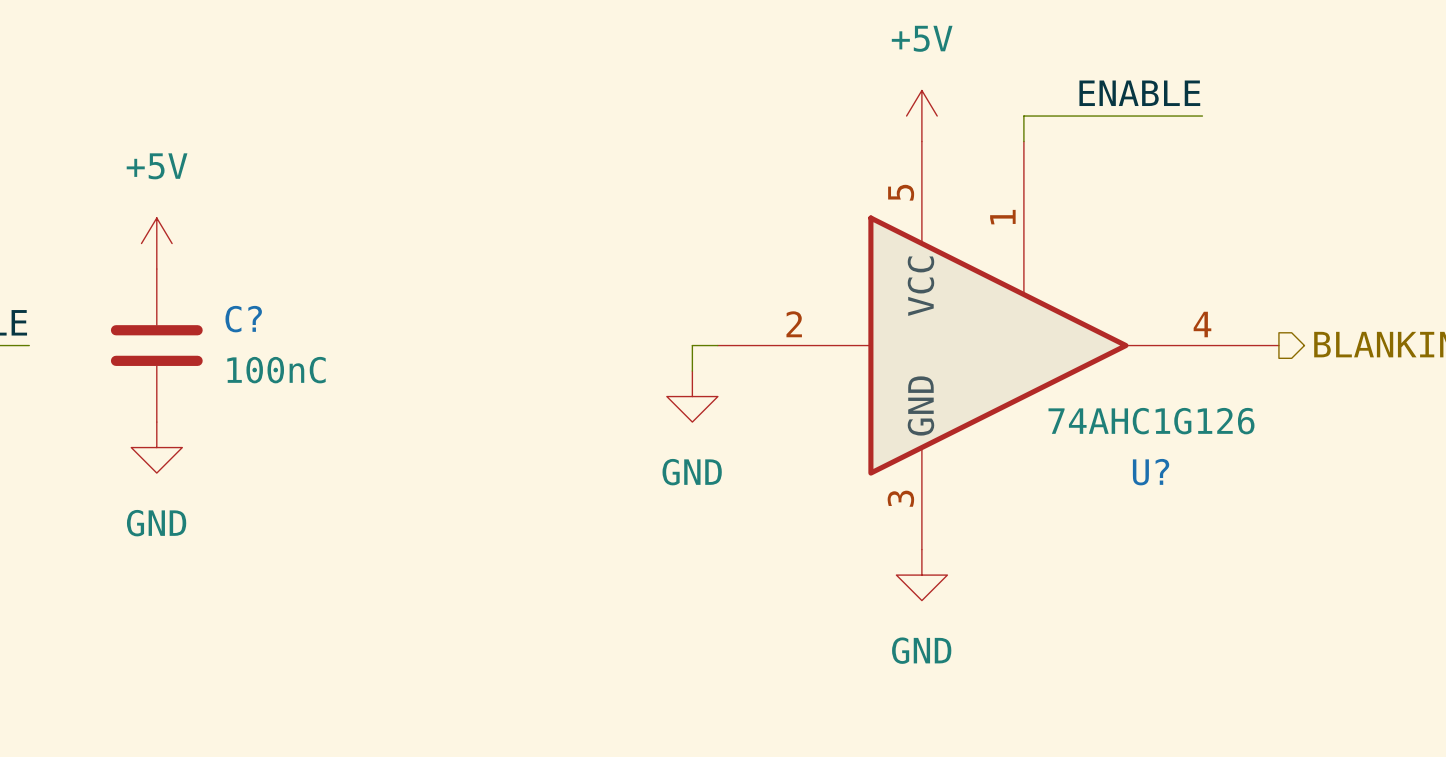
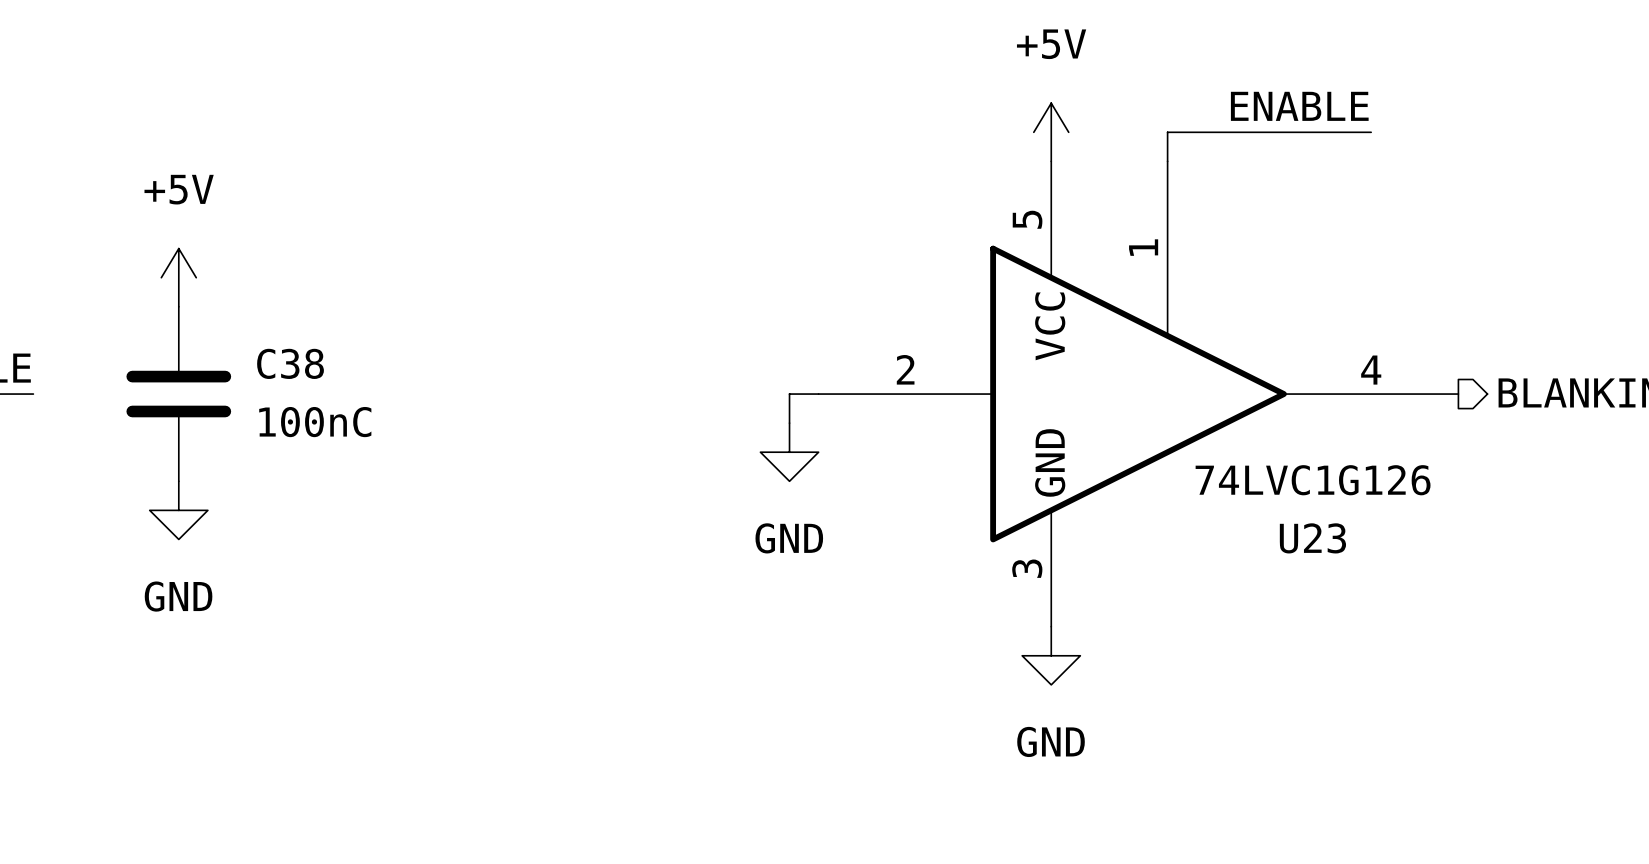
C? name: C? (243, 319) -> C38 (290, 363)
U? value: 74AHC1G126 (1151, 421) -> 74LVC1G126 (1313, 480)
U? name: U? (1151, 472) -> U23 (1312, 538)

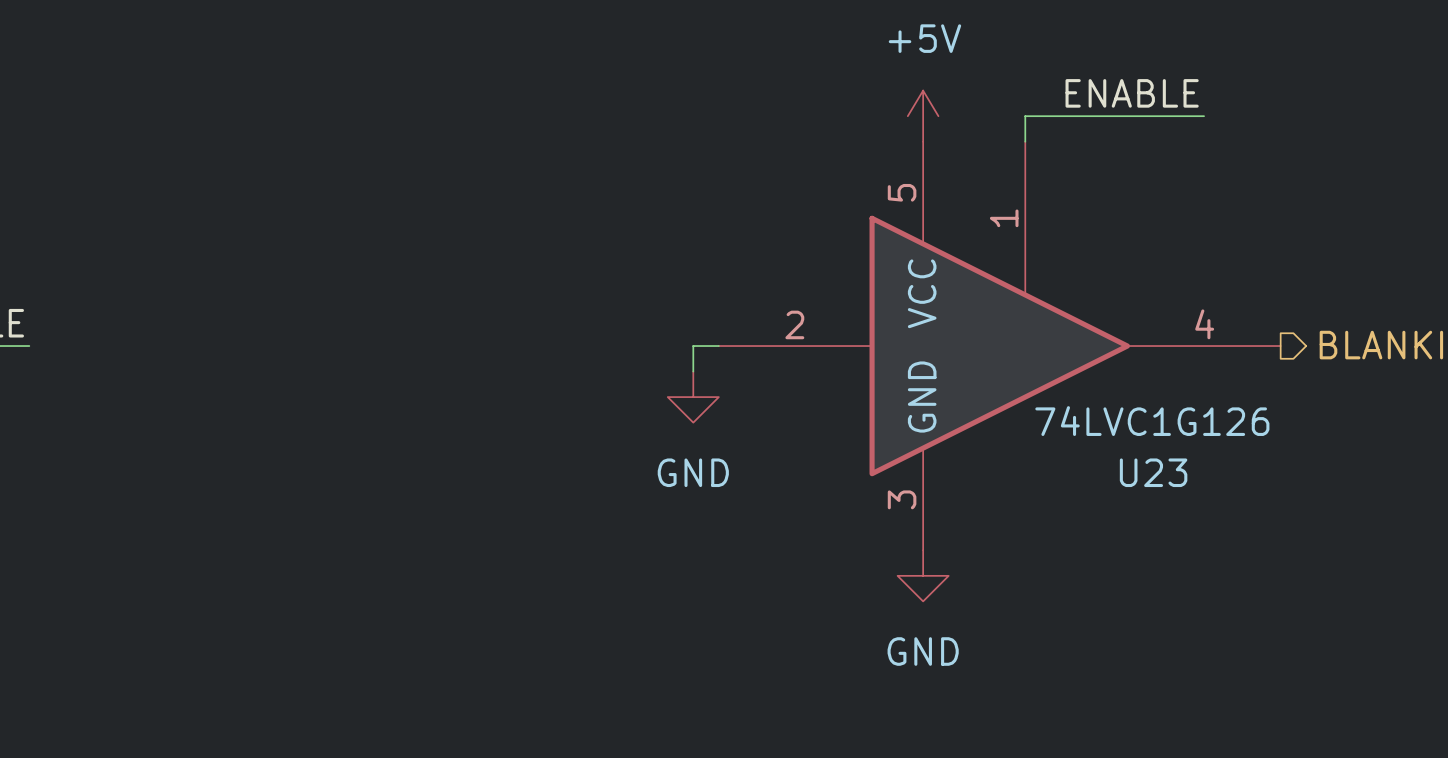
power symbol: +5V (178, 277) -> none
C38: 100nC (178, 394) -> none
power symbol: GND (178, 510) -> none

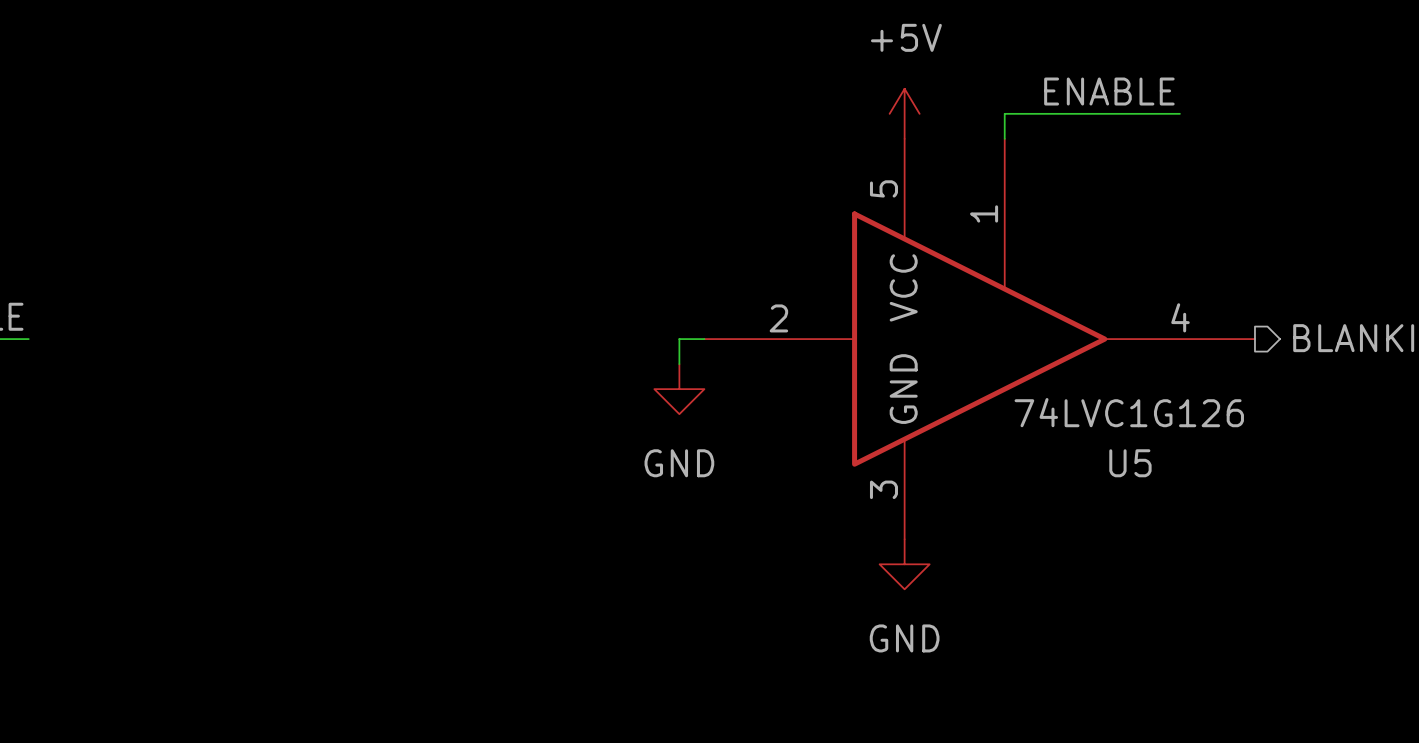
U23 name: U23 (1153, 472) -> U5 (1130, 463)

